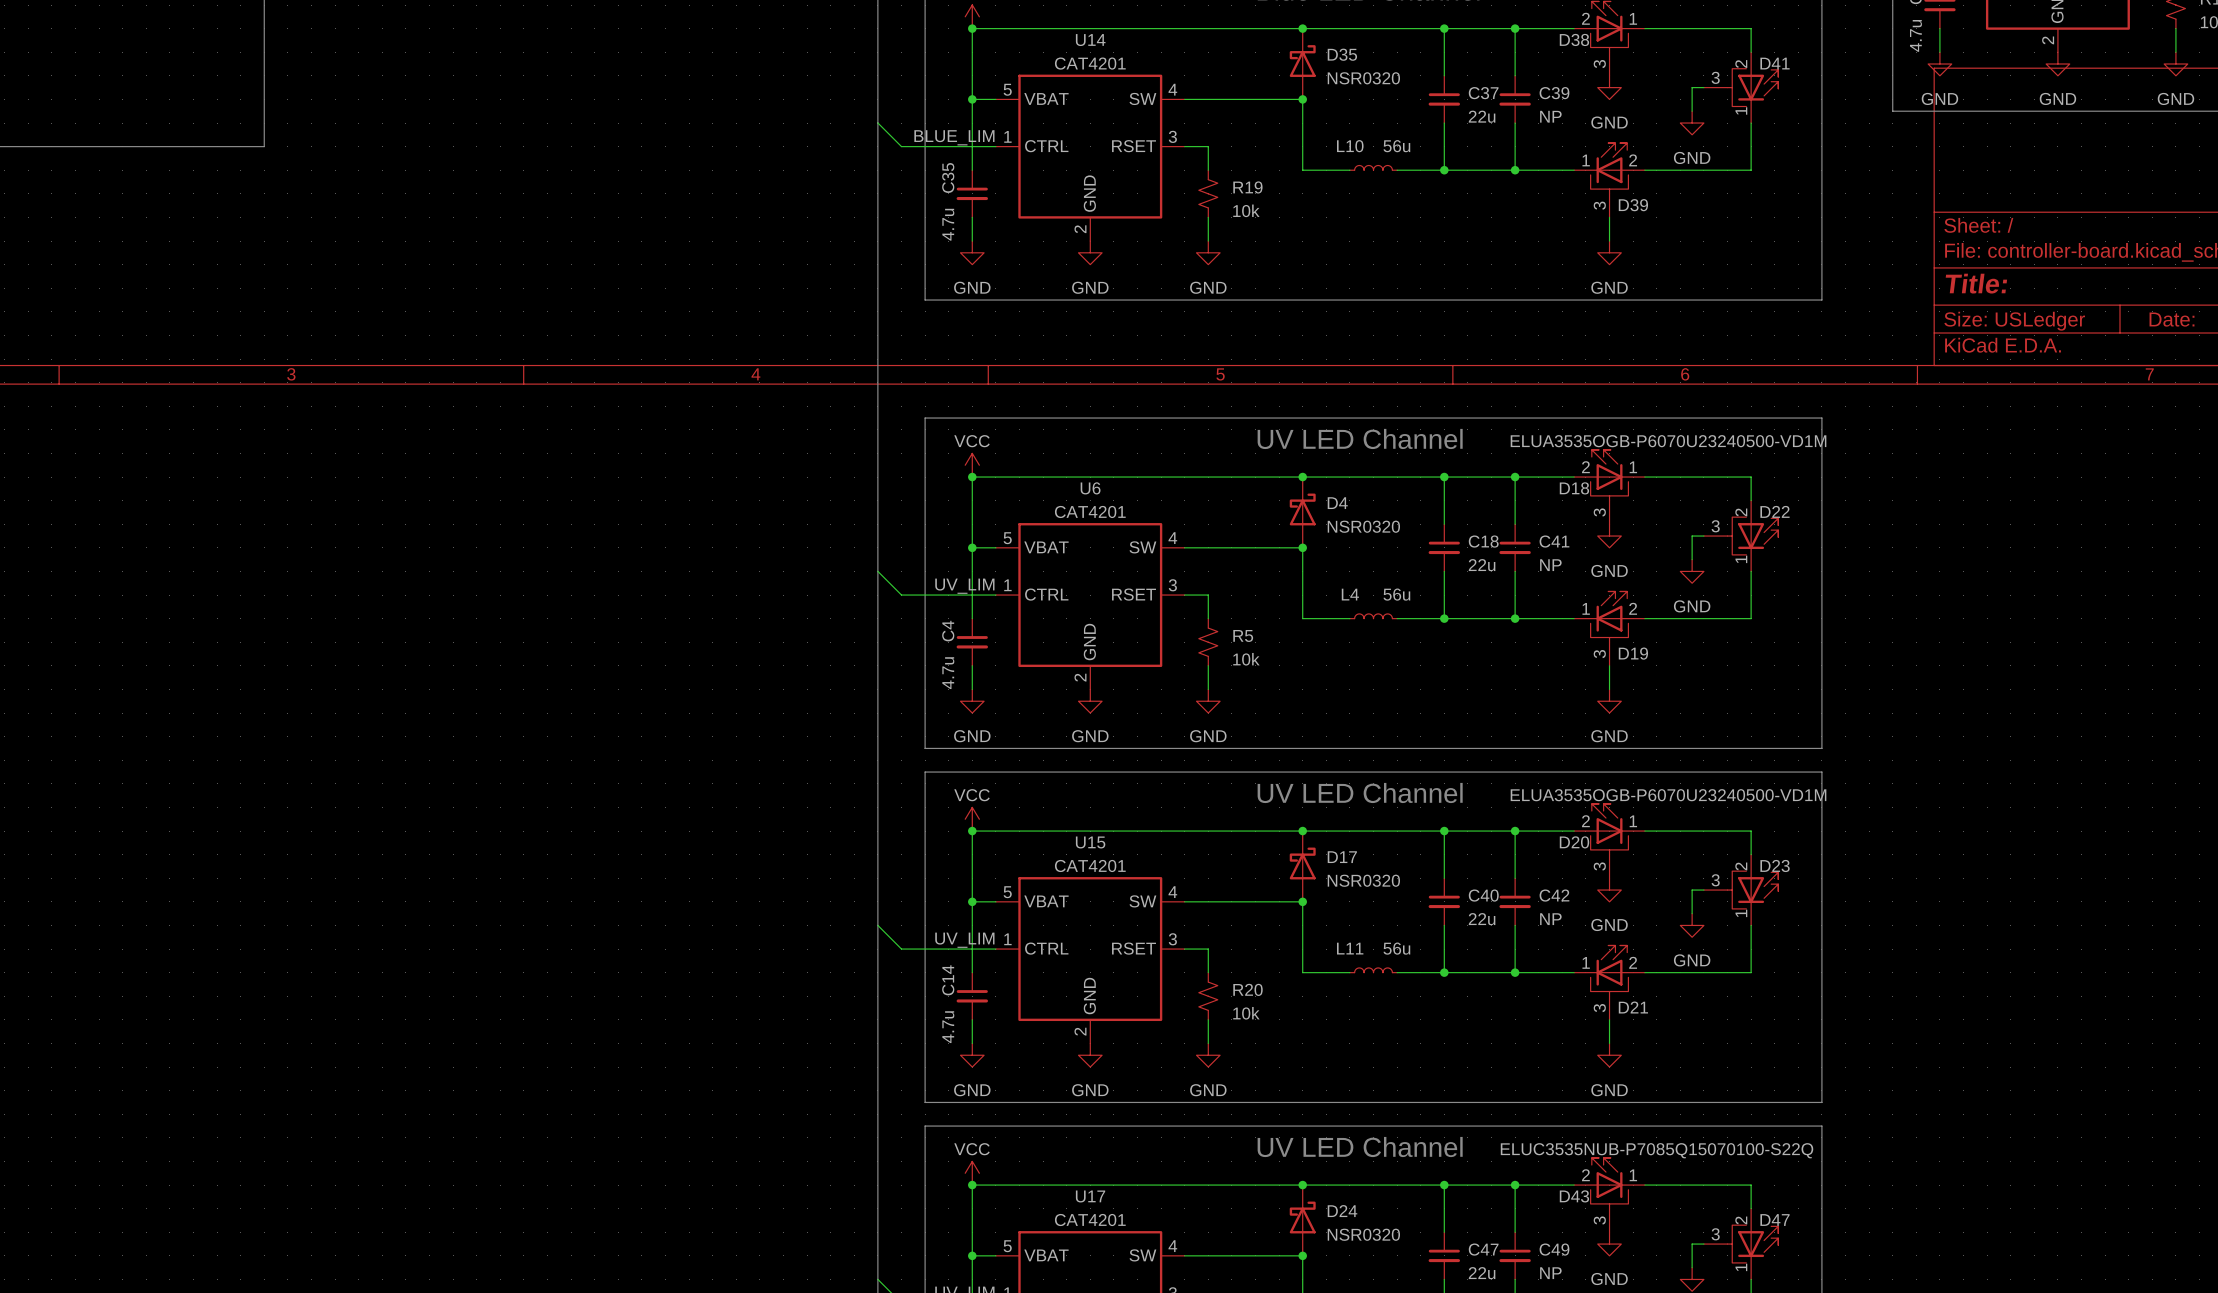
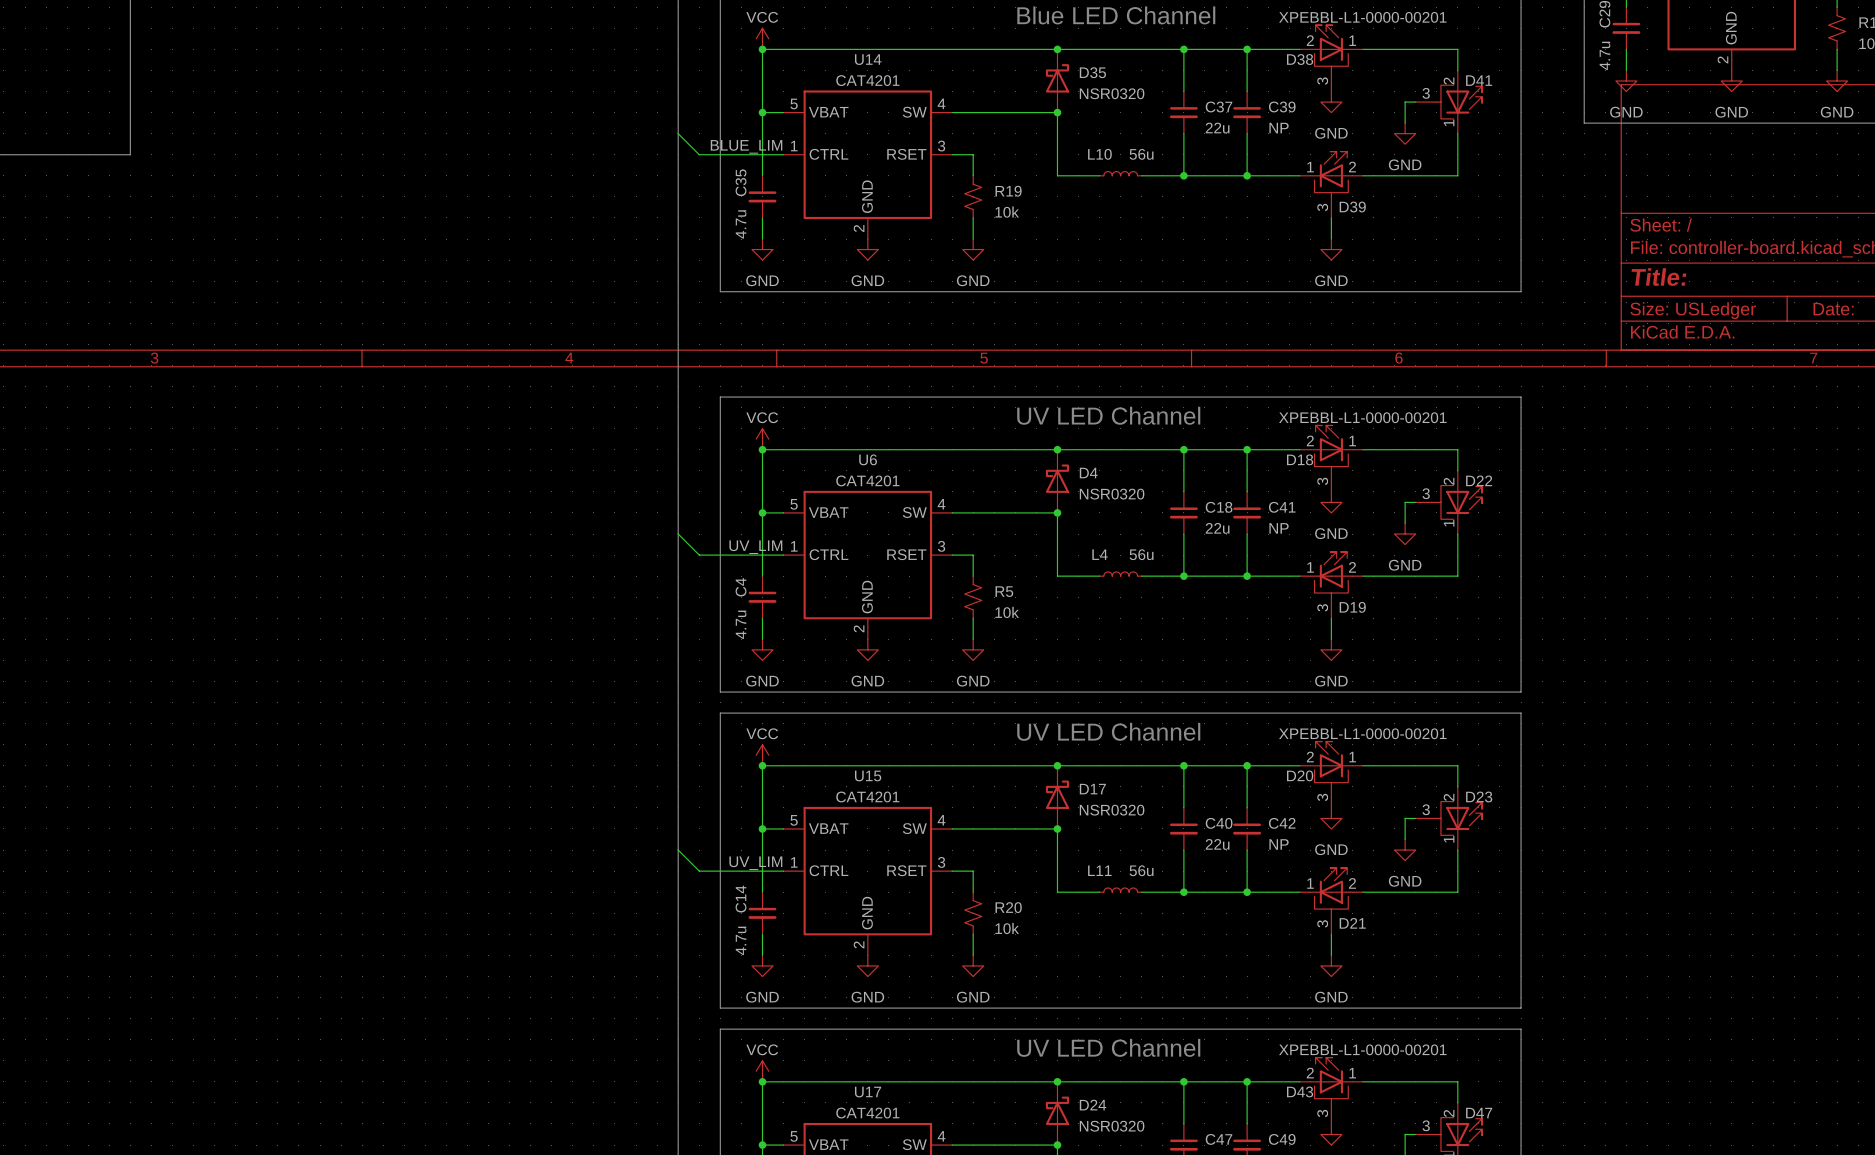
D18 value: ELUA3535OGB-P6070U23240500-VD1M (1668, 441) -> XPEBBL-L1-0000-00201 (1362, 417)
D20 value: ELUA3535OGB-P6070U23240500-VD1M (1668, 795) -> XPEBBL-L1-0000-00201 (1362, 733)
D43 value: ELUC3535NUB-P7085Q15070100-S22Q (1657, 1150) -> XPEBBL-L1-0000-00201 (1362, 1049)

